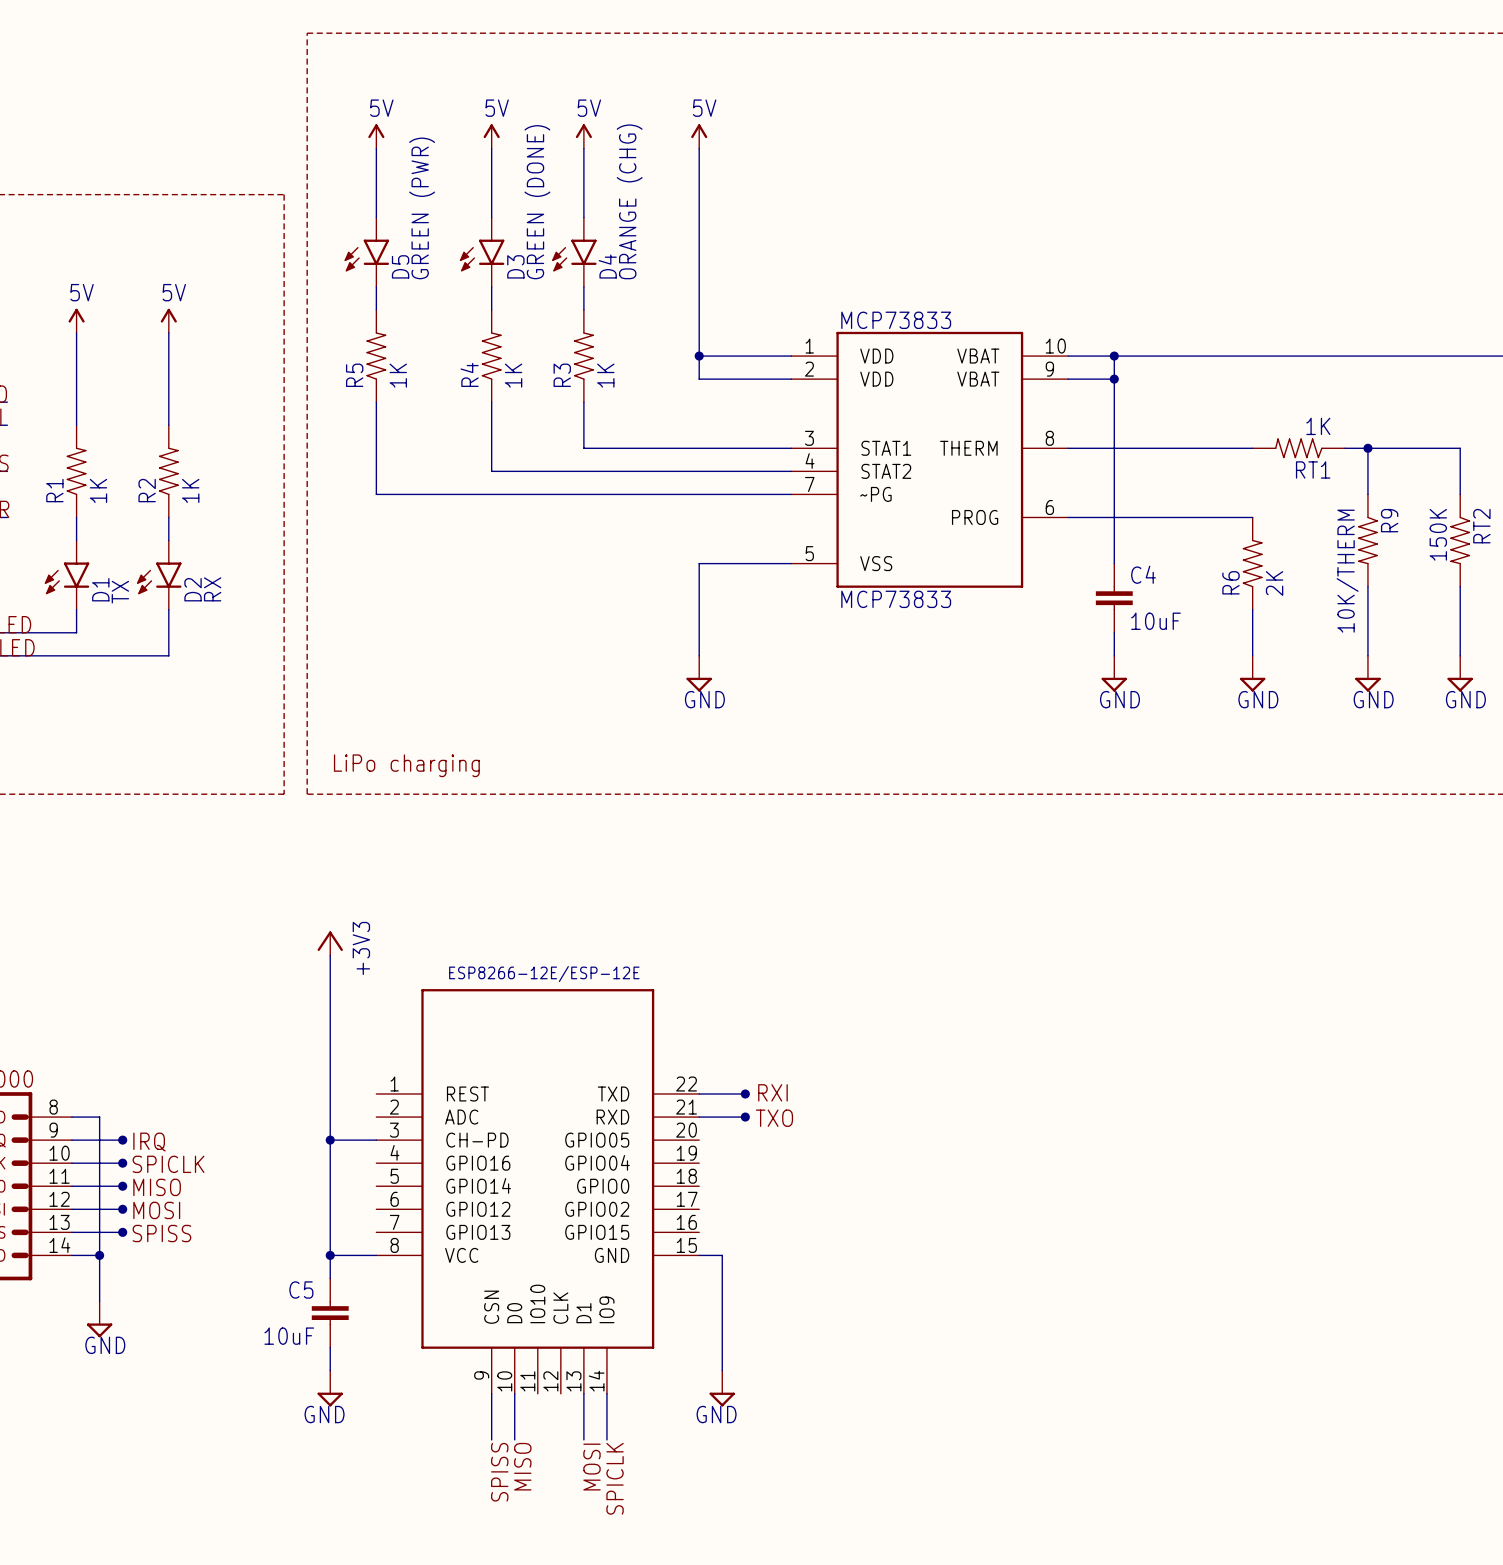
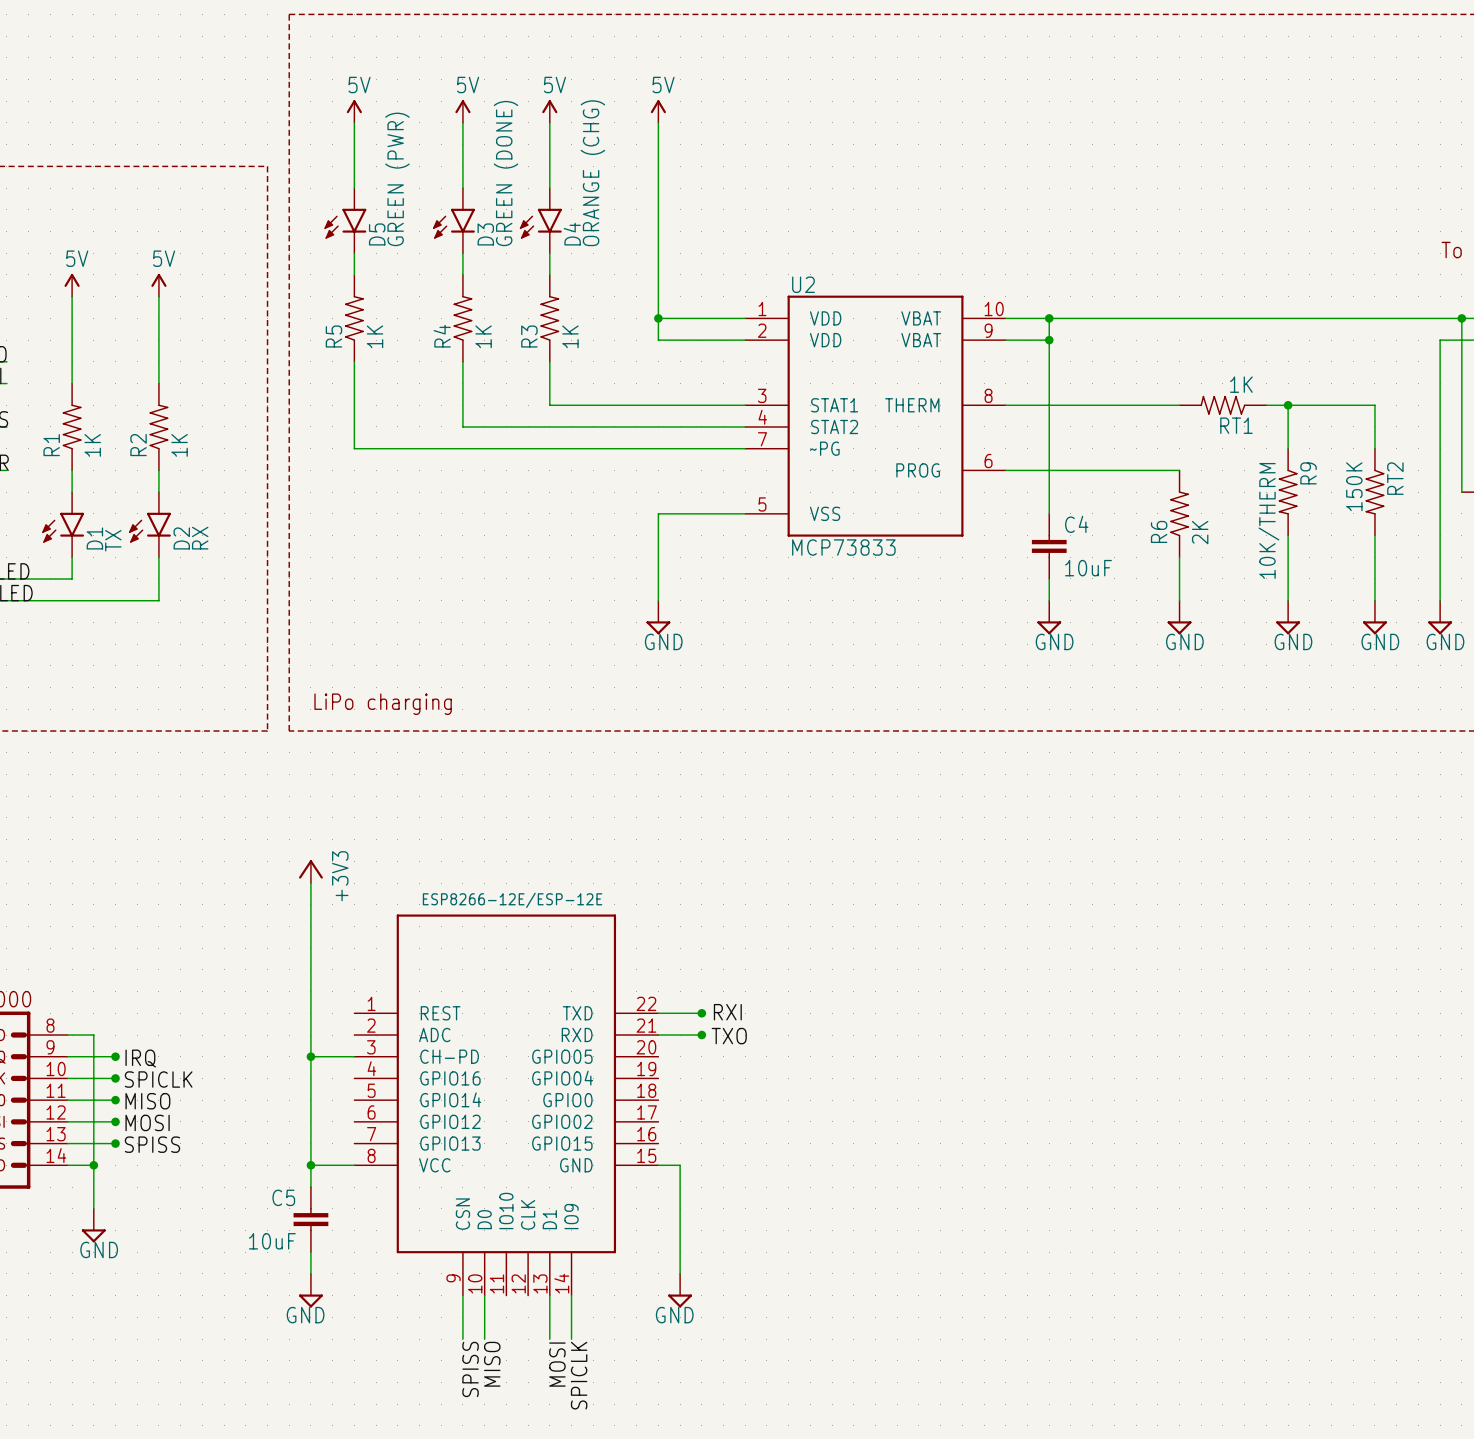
MCP73833 name: MCP73833 (896, 320) -> U2 (803, 284)

